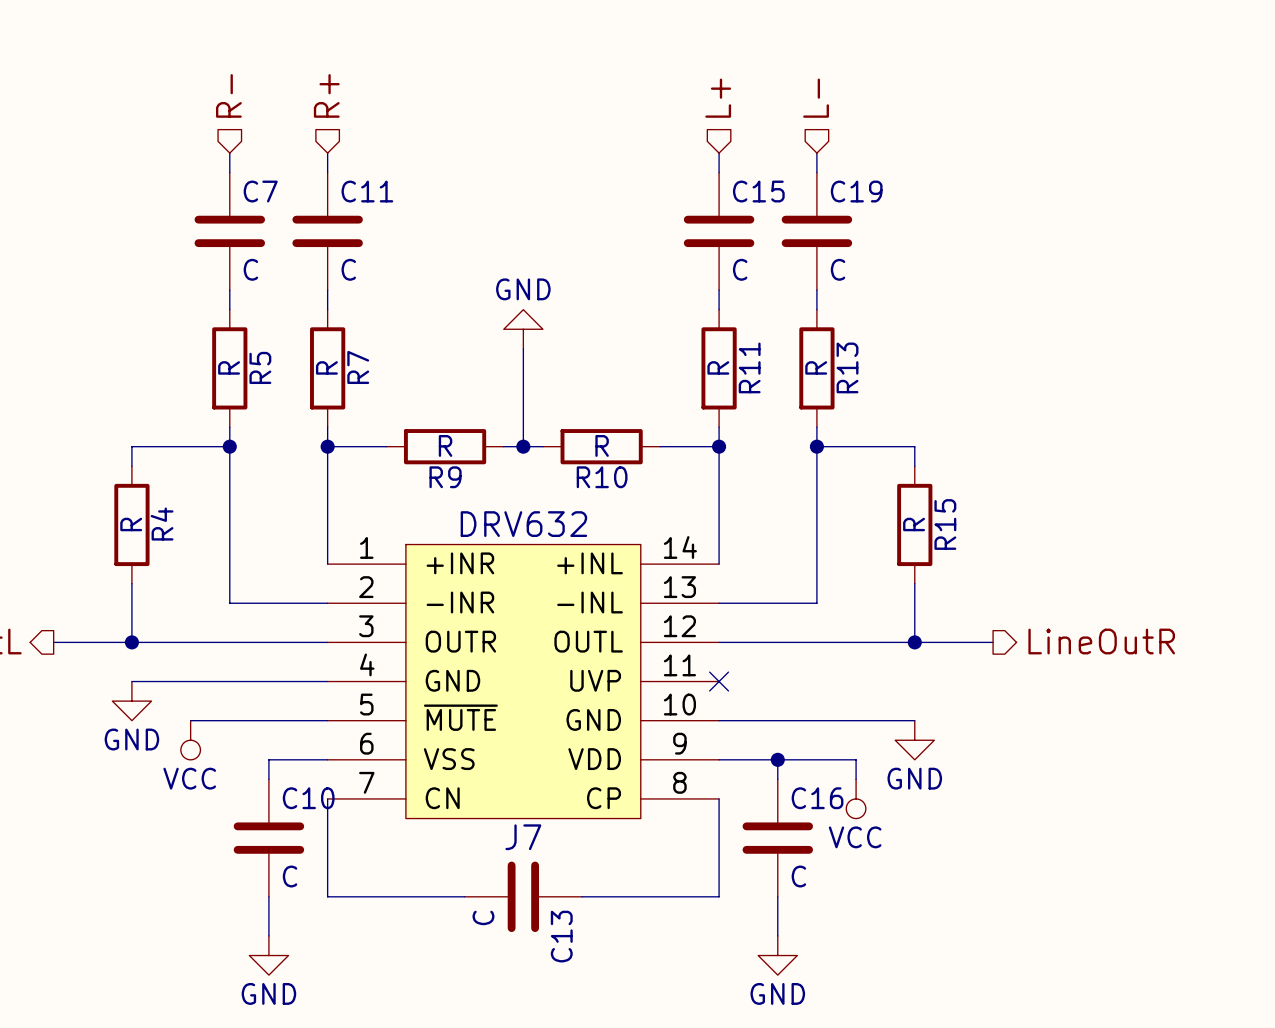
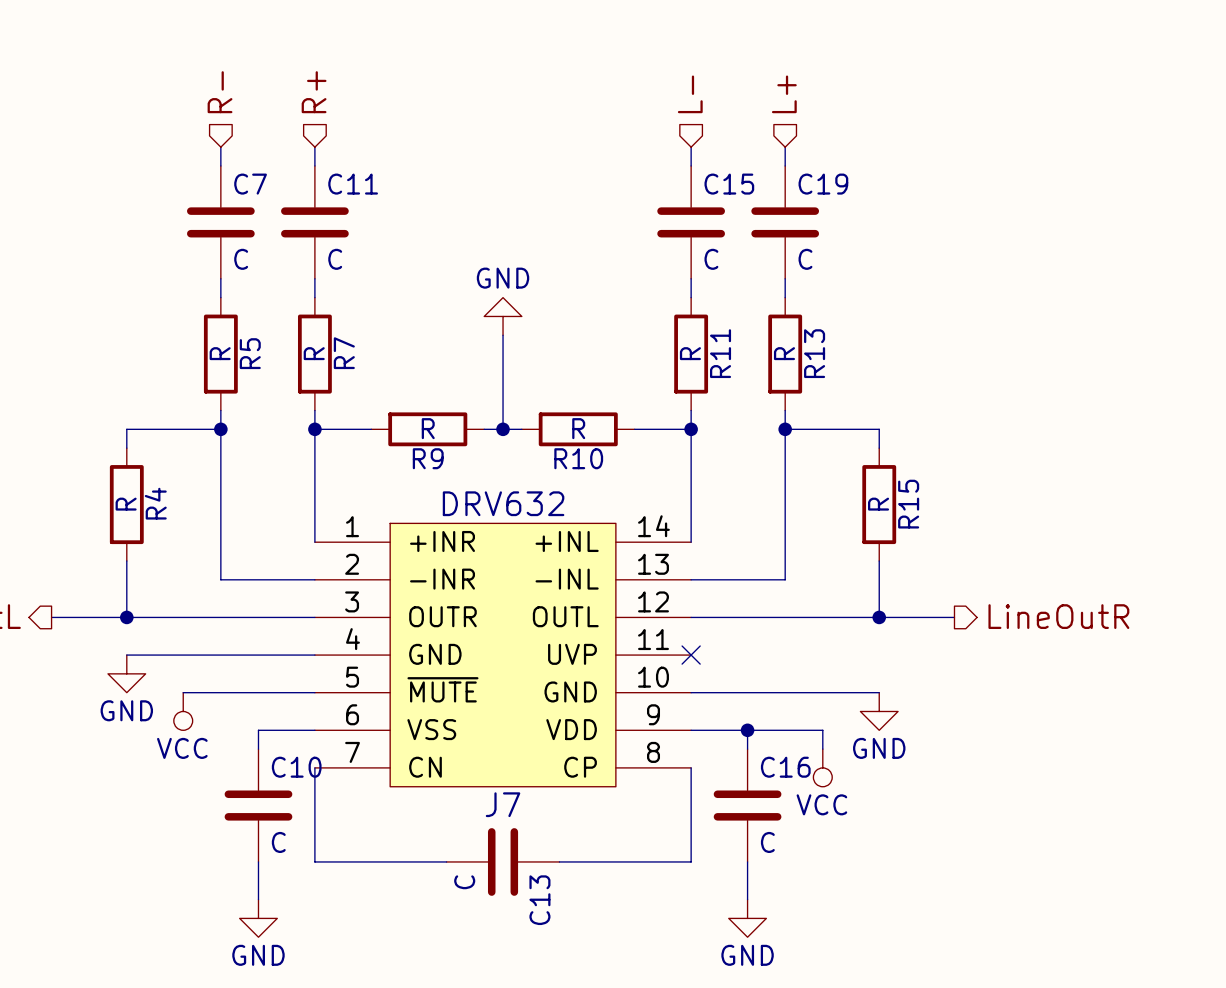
hierarchical label: L+ (718, 98) -> L- (690, 94)
hierarchical label: L- (816, 98) -> L+ (784, 94)

